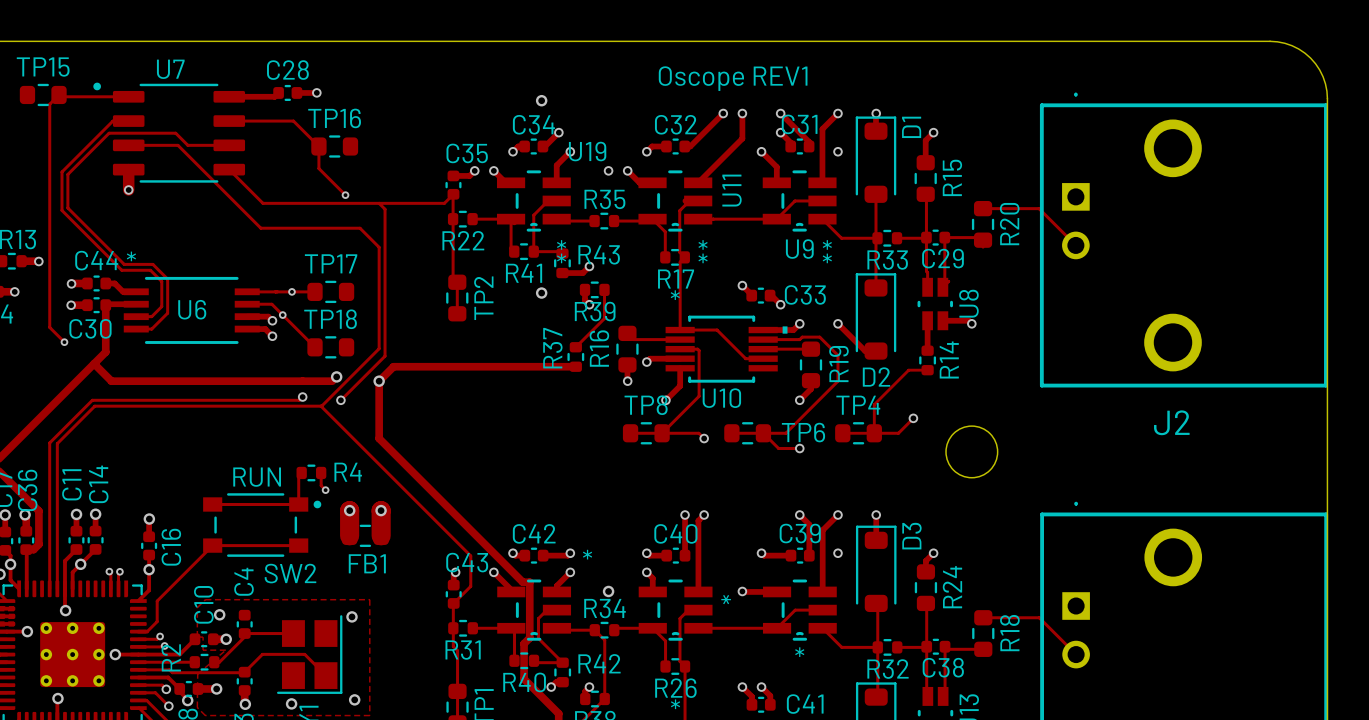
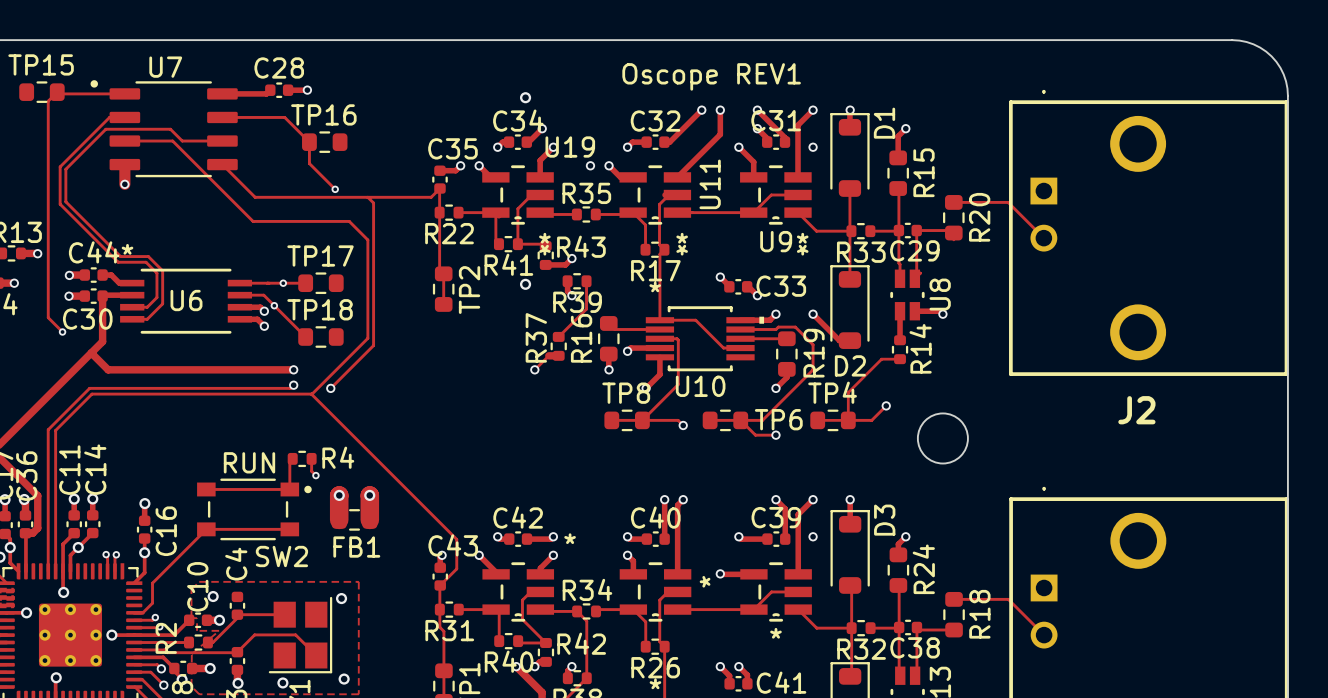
track: (565, 366) (393, 366) (379, 381) (379, 438) (522, 582) (529, 582) (529, 638) (524, 643) (524, 679) (532, 687) -> (548, 355) (534, 369)
track: (336, 376) (332, 381) (302, 381) -> none
via: (336, 376) -> none
via: none -> (293, 369)
via: (379, 381) -> none
via: none -> (534, 369)
via: (608, 591) -> none
via: none -> (516, 666)

